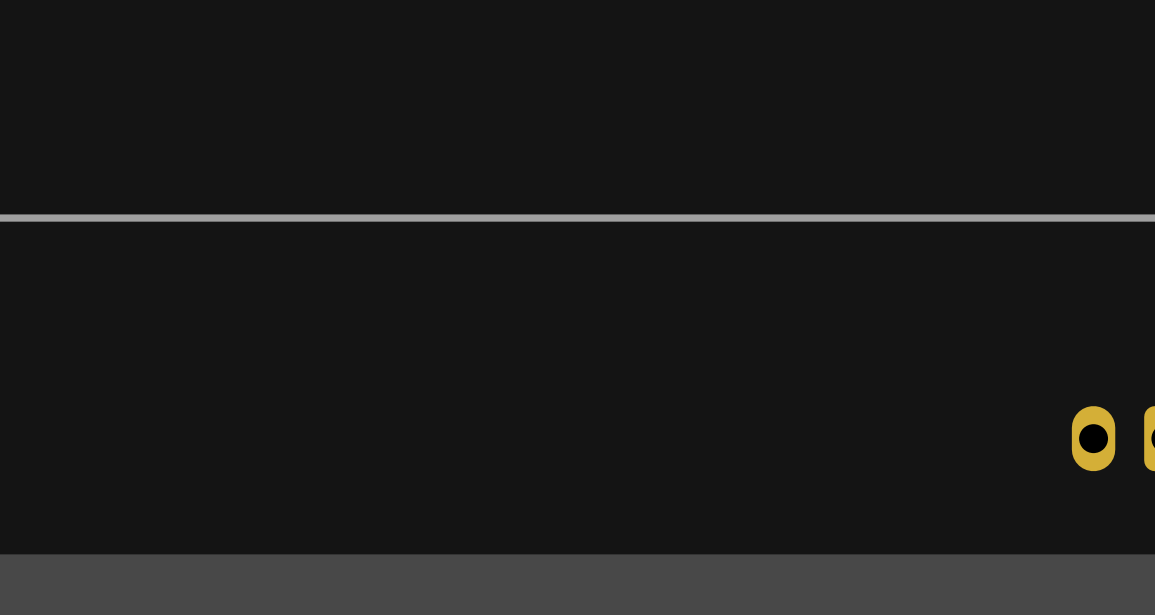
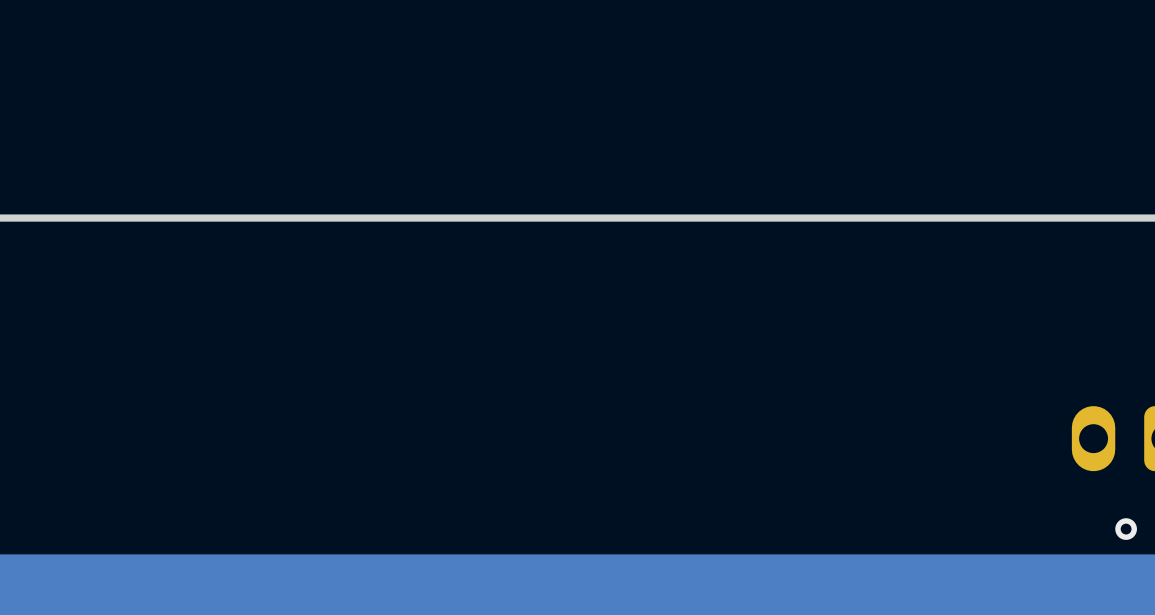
via: none -> (1126, 529)

